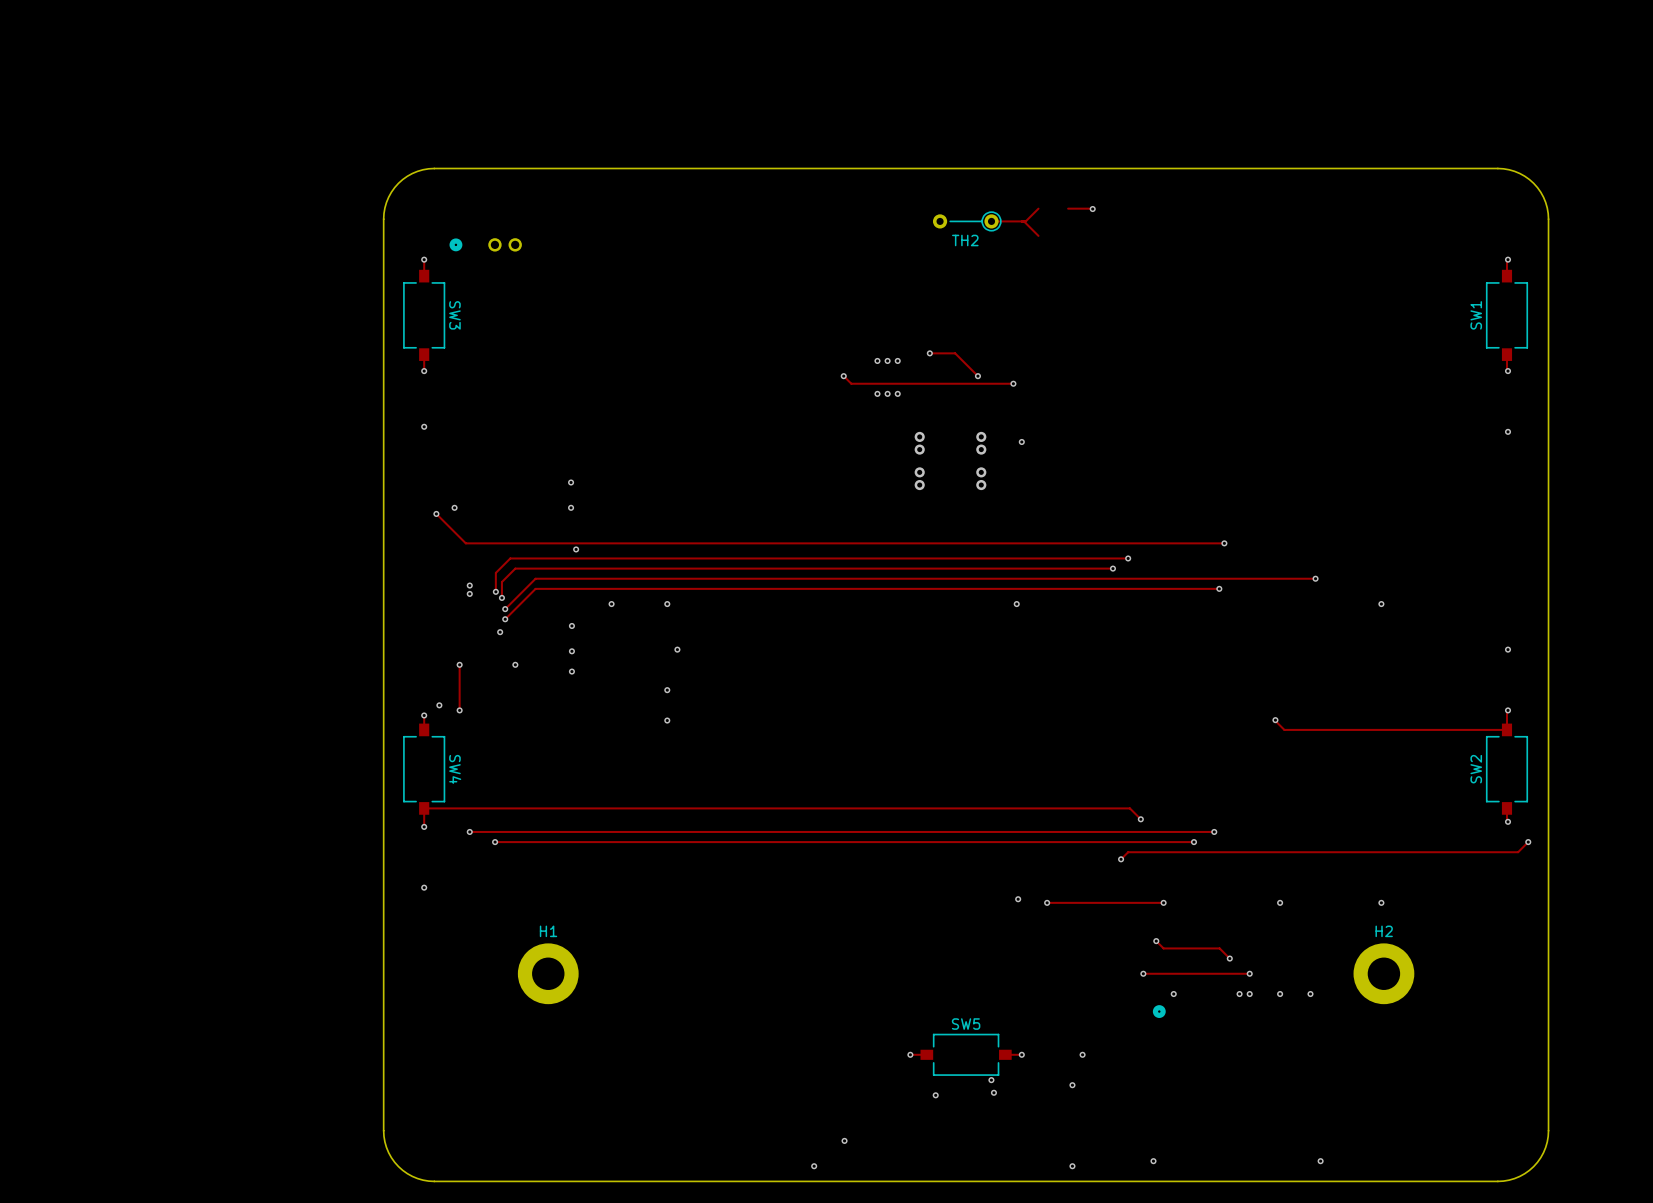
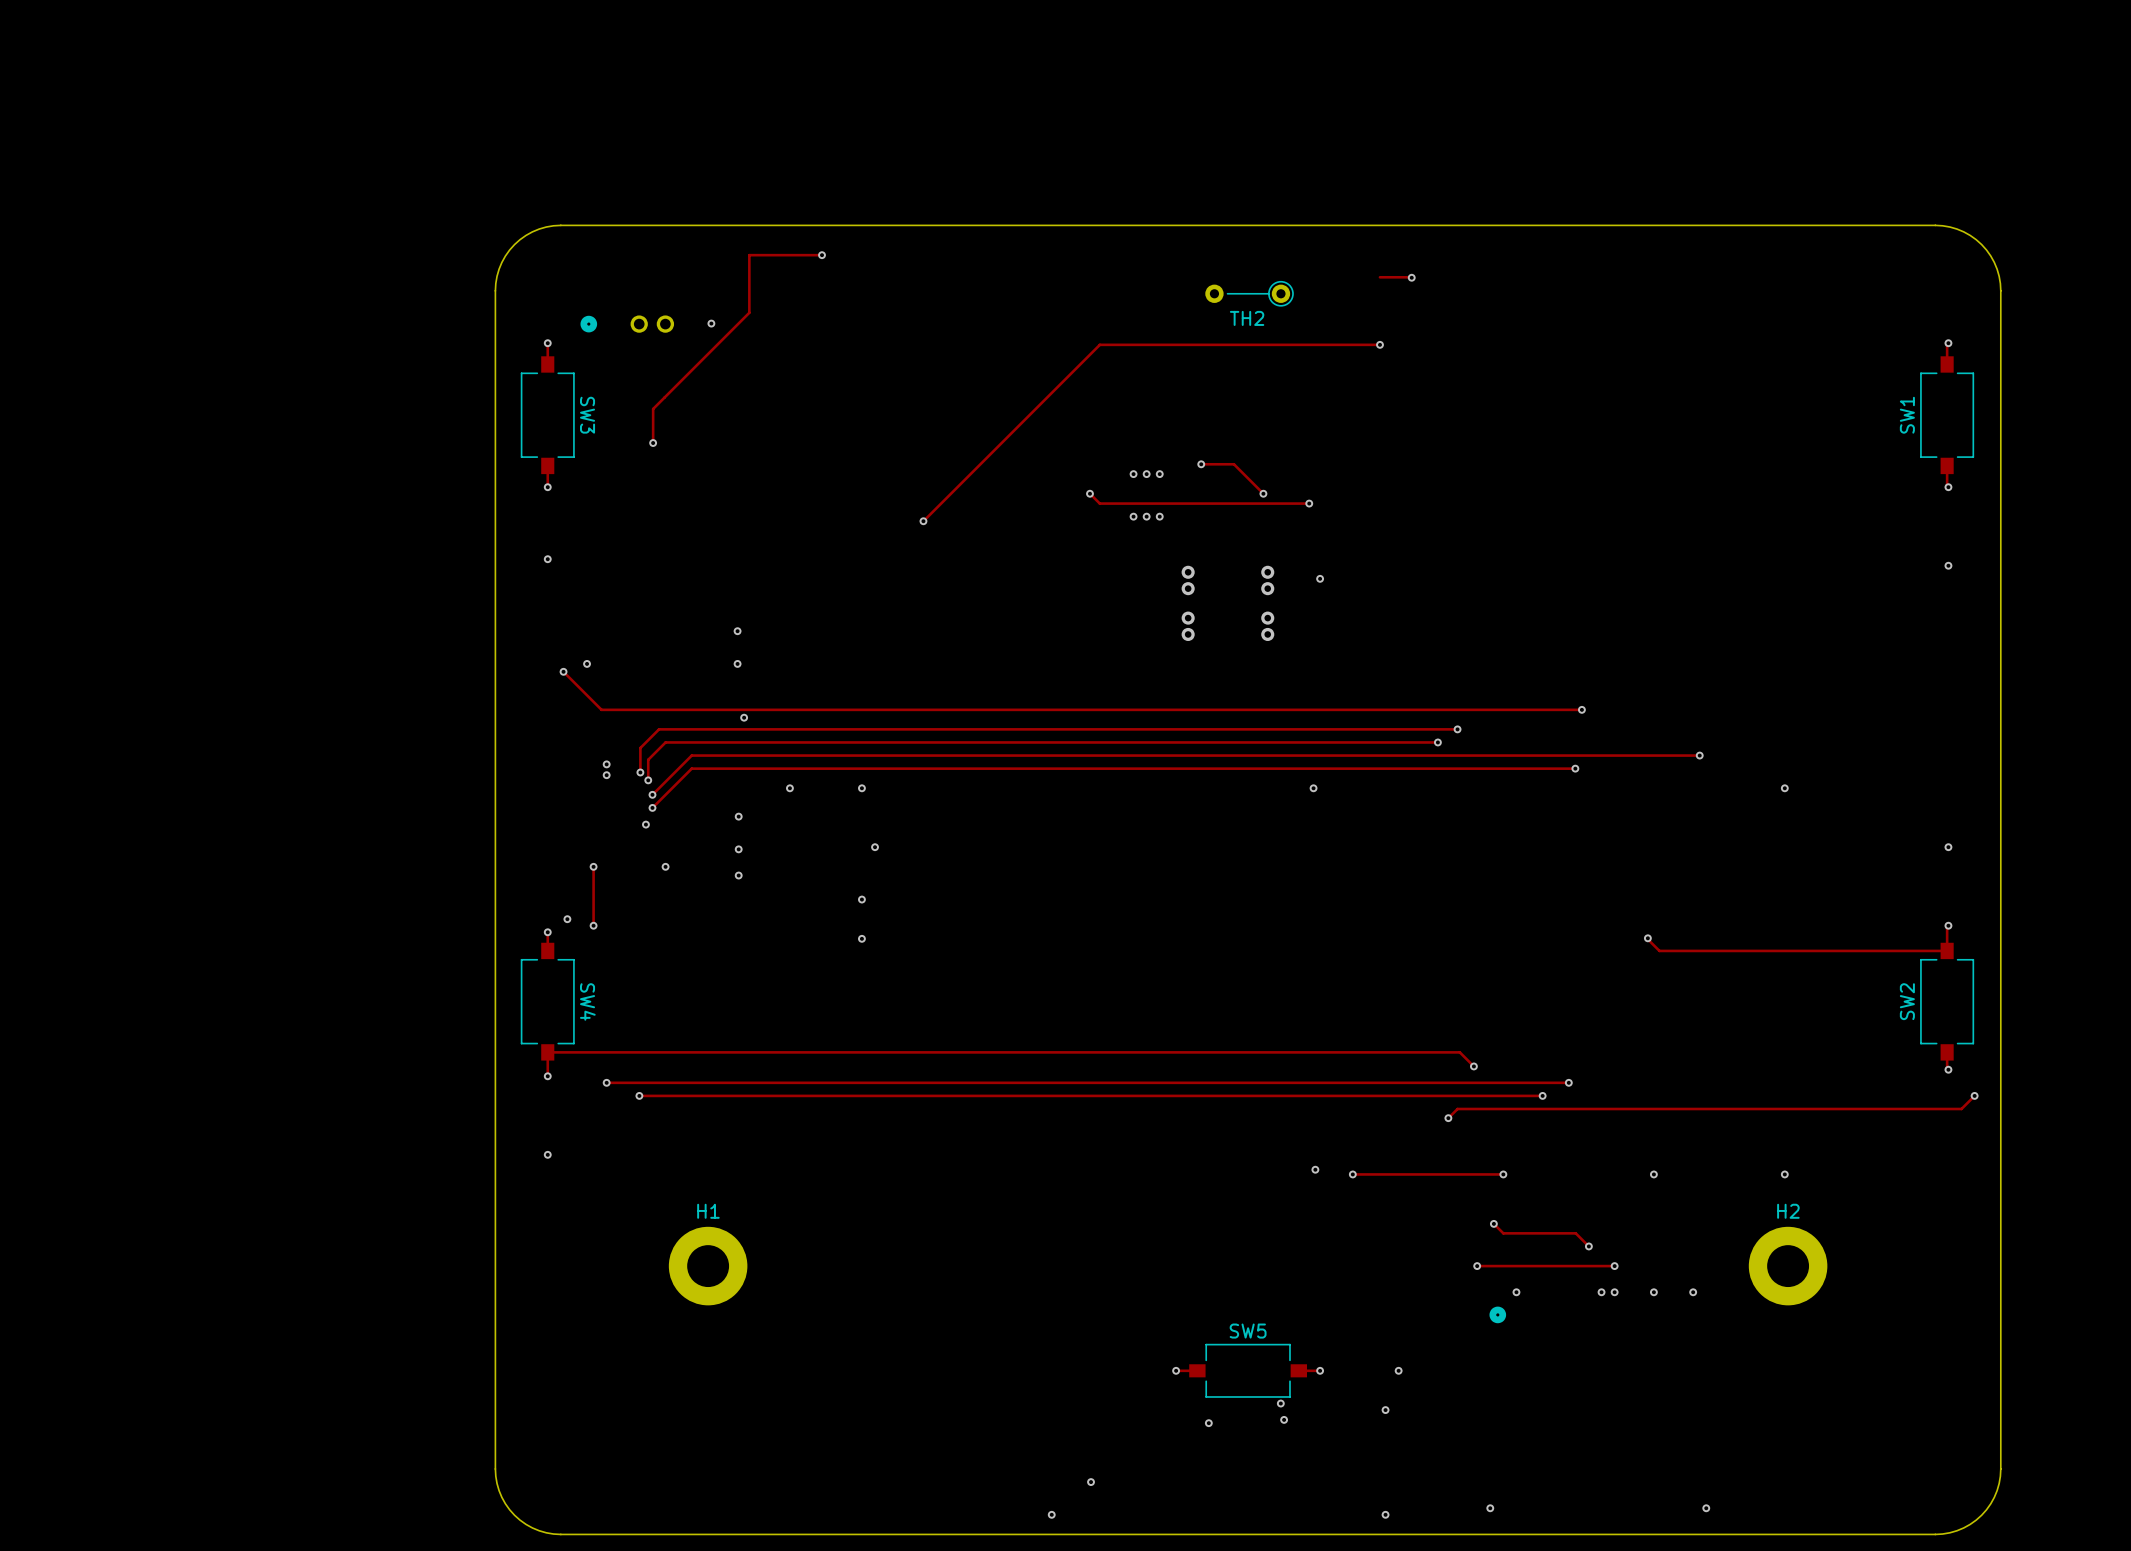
track: none -> (822, 255) (749, 255) (749, 312) (653, 408) (653, 443)
via: none -> (822, 255)
track: (1038, 208) (1025, 221) (991, 221) -> none
track: (1024, 221) (1038, 235) -> none
via: none -> (711, 323)
track: none -> (1379, 344) (1099, 344) (923, 521)
via: none -> (1379, 344)
via: none -> (653, 443)
via: none -> (923, 521)

